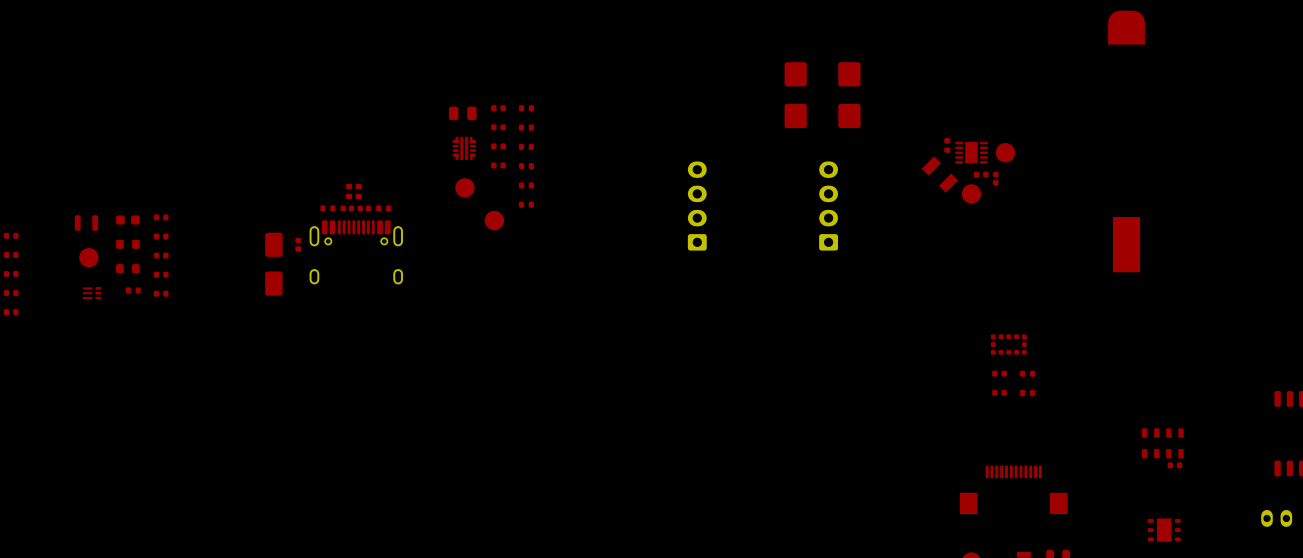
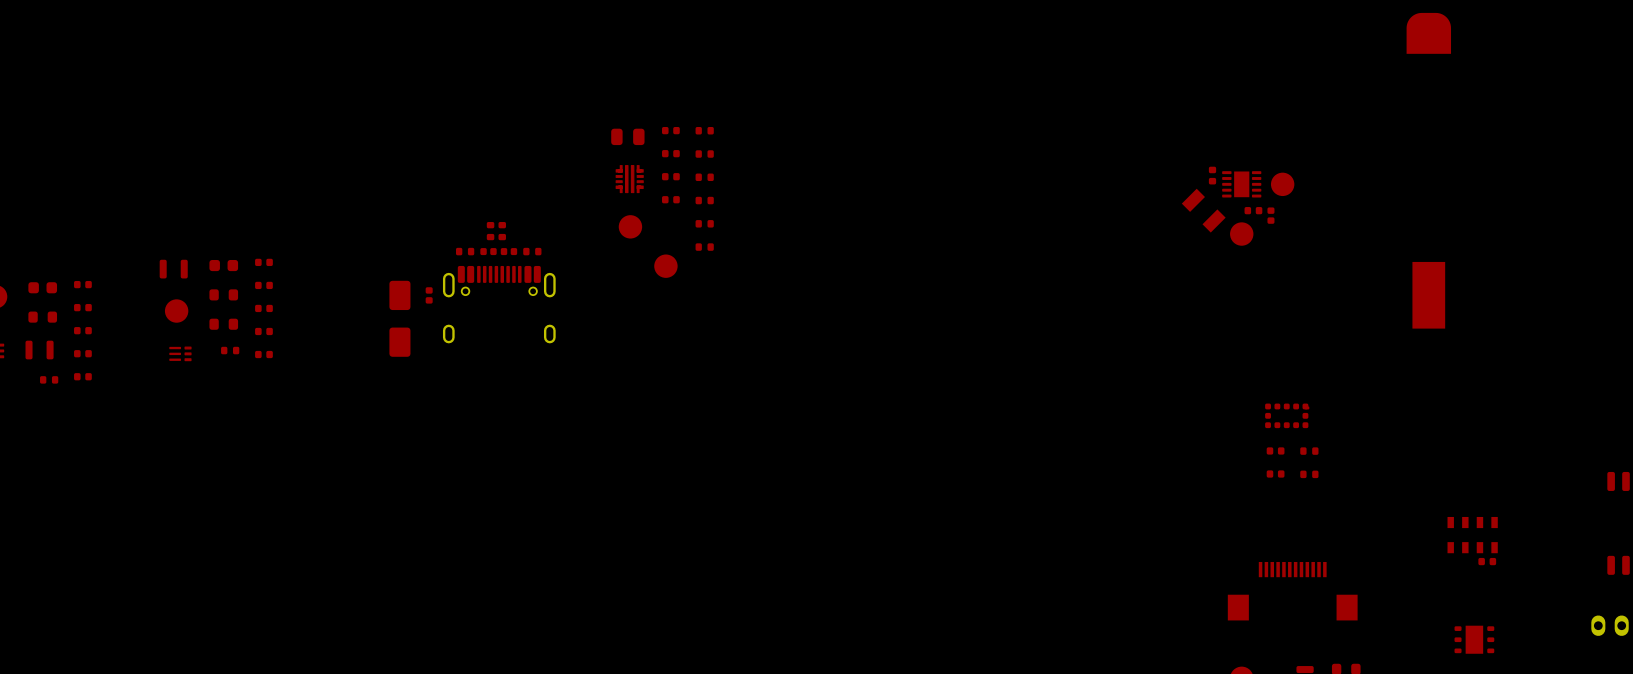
part: (795, 95) -> none
part: (849, 95) -> none
part: (697, 206) -> none
part: (828, 206) -> none

